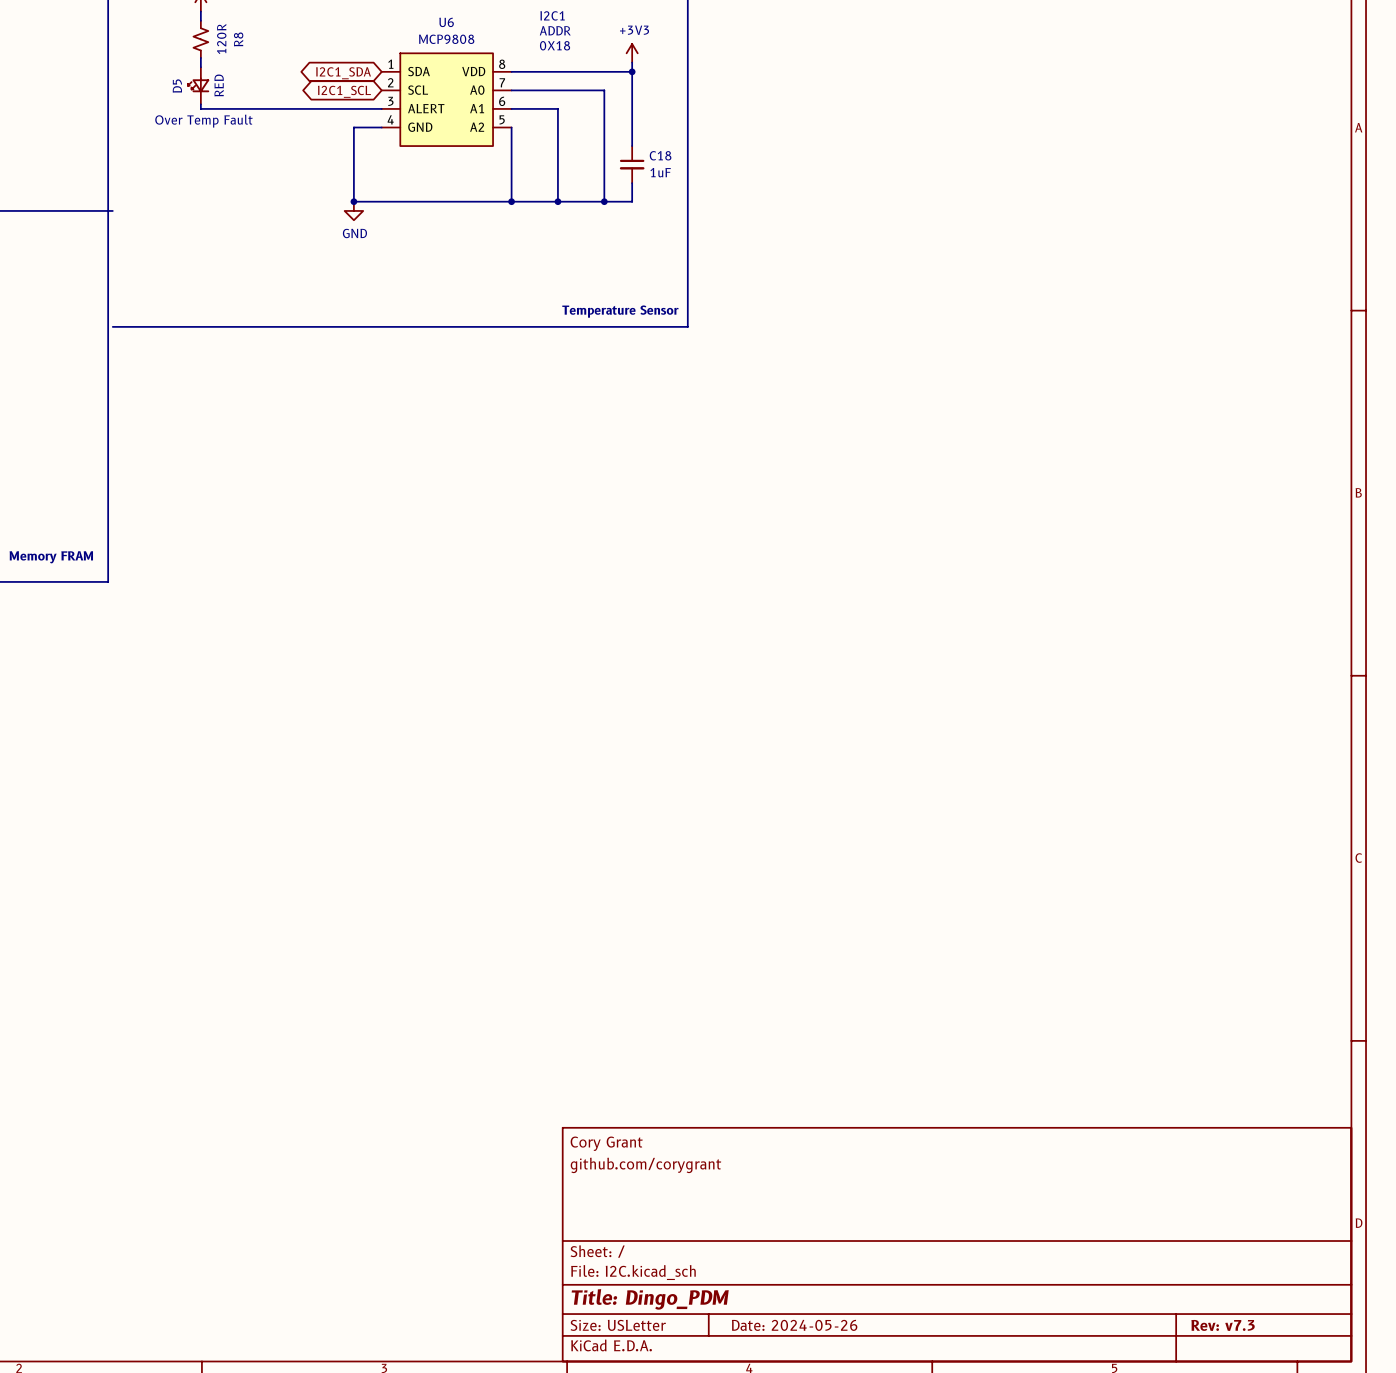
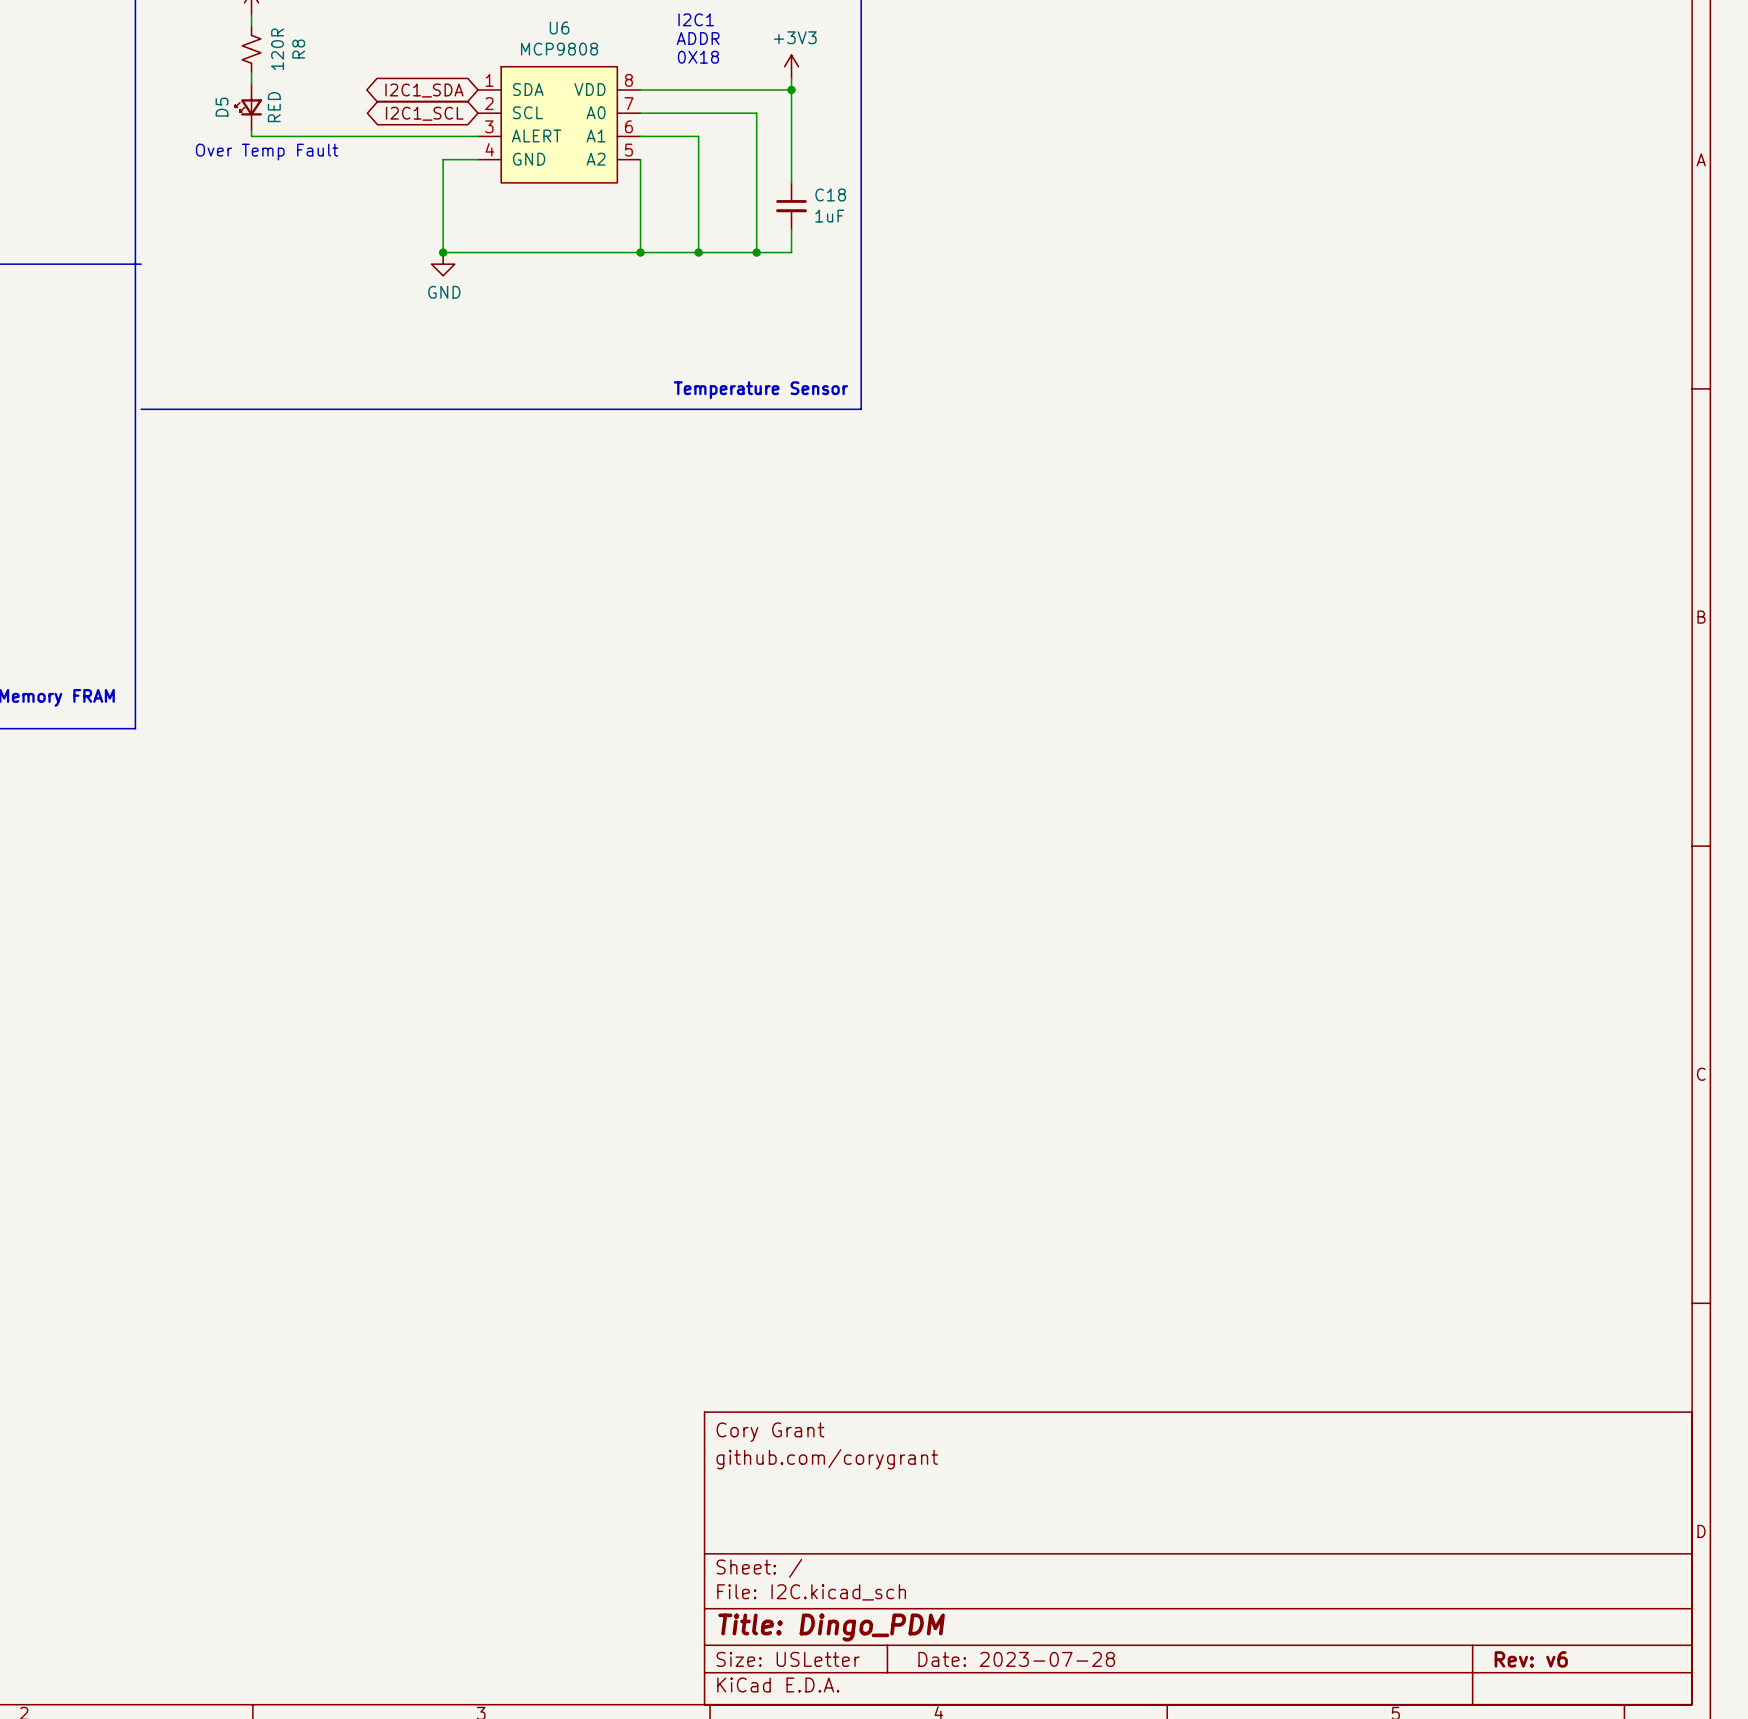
title block: Date: 2024-05-26 (794, 1325) -> Date: 2023-07-28 (1016, 1659)
title block: Rev: v7.3 (1223, 1325) -> Rev: v6 (1531, 1659)

